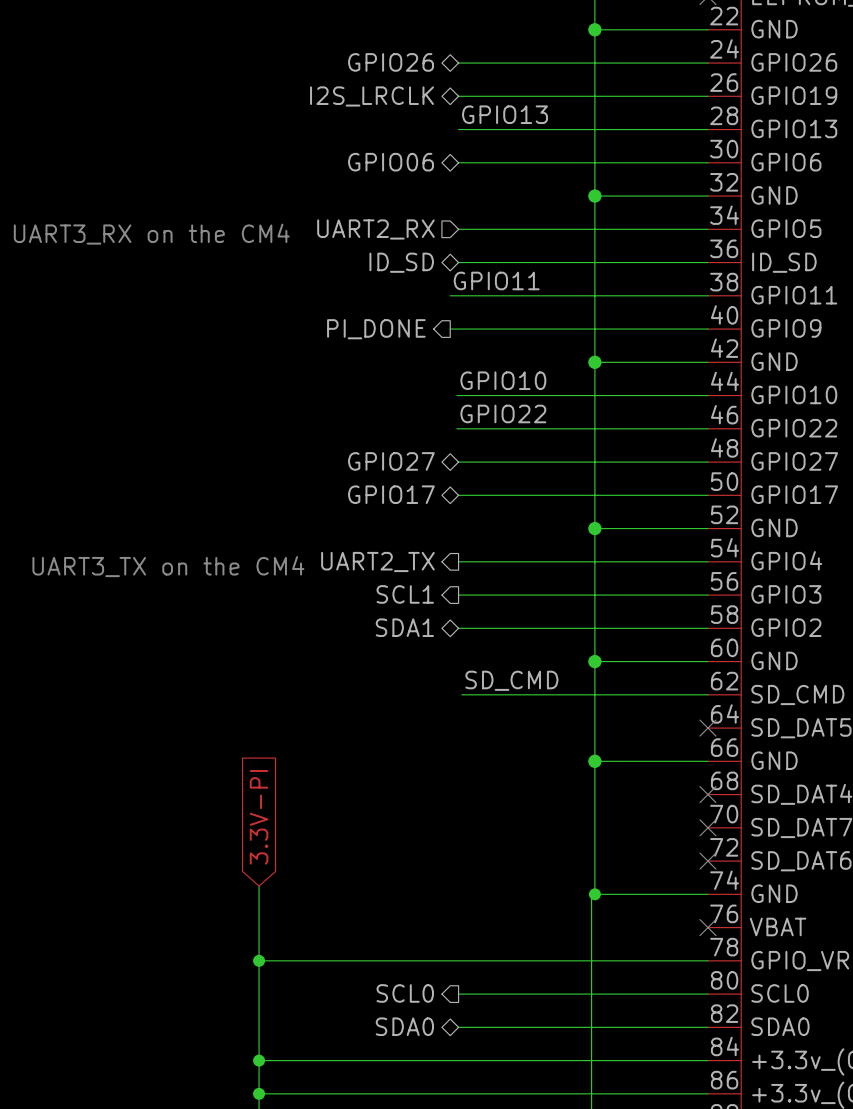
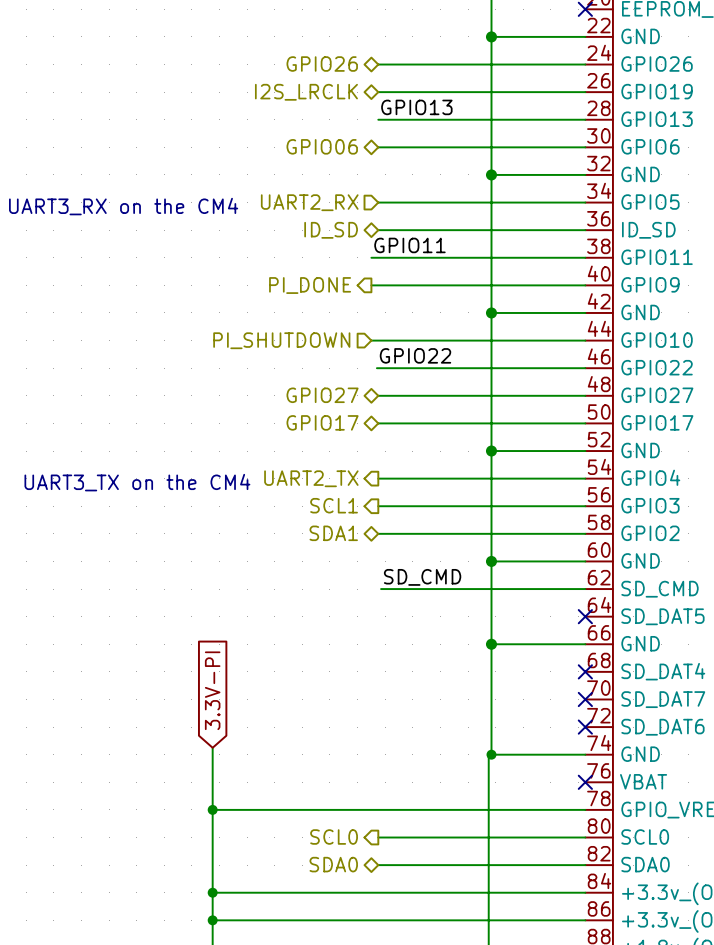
label: GPIO10 (503, 380) -> none
hierarchical label: none -> PI_SHUTDOWN (281, 340)
wire: none -> (371, 340) (376, 340)

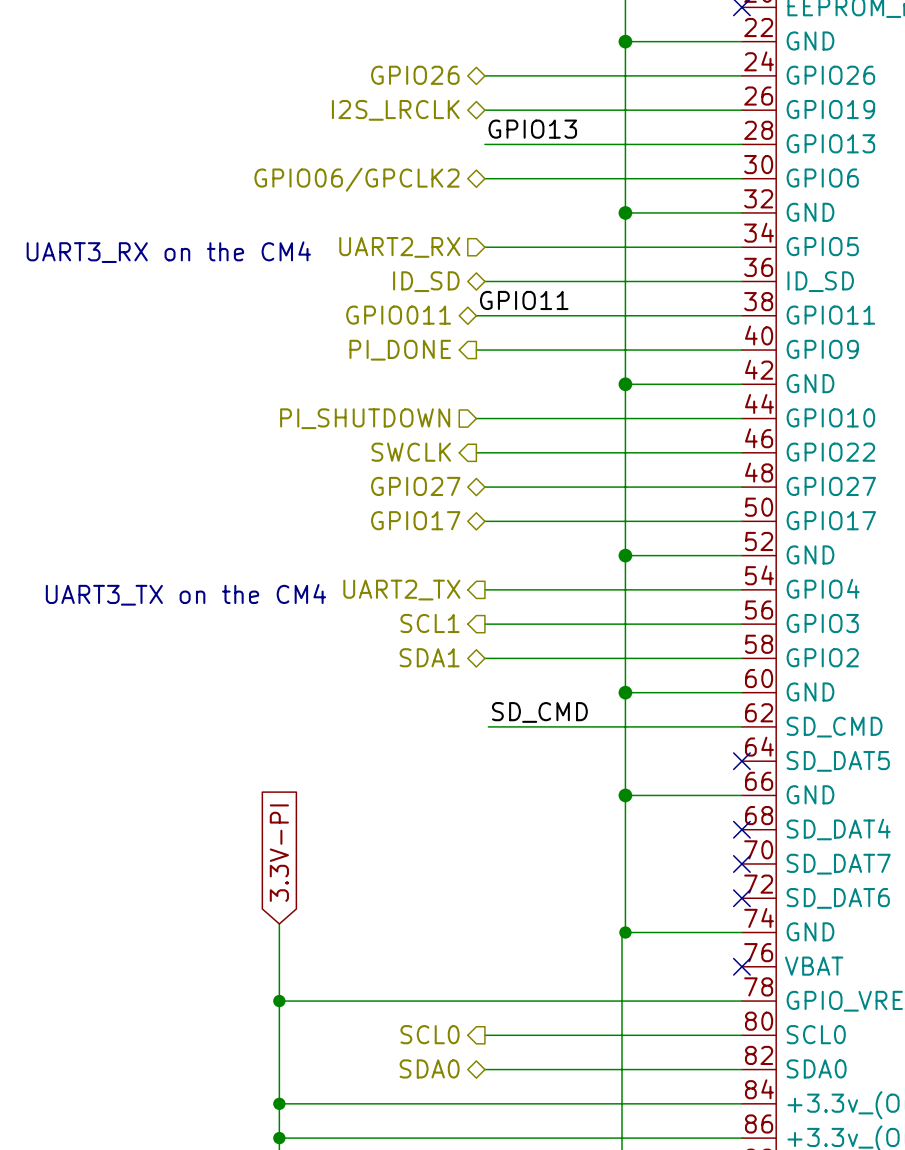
hierarchical label: GPIO06 (322, 146) -> GPIO06/GPCLK2 (357, 179)
hierarchical label: none -> GPIO011 (398, 315)
label: GPIO22 (415, 355) -> none
hierarchical label: none -> SWCLK (411, 452)
wire: none -> (476, 452) (483, 452)

